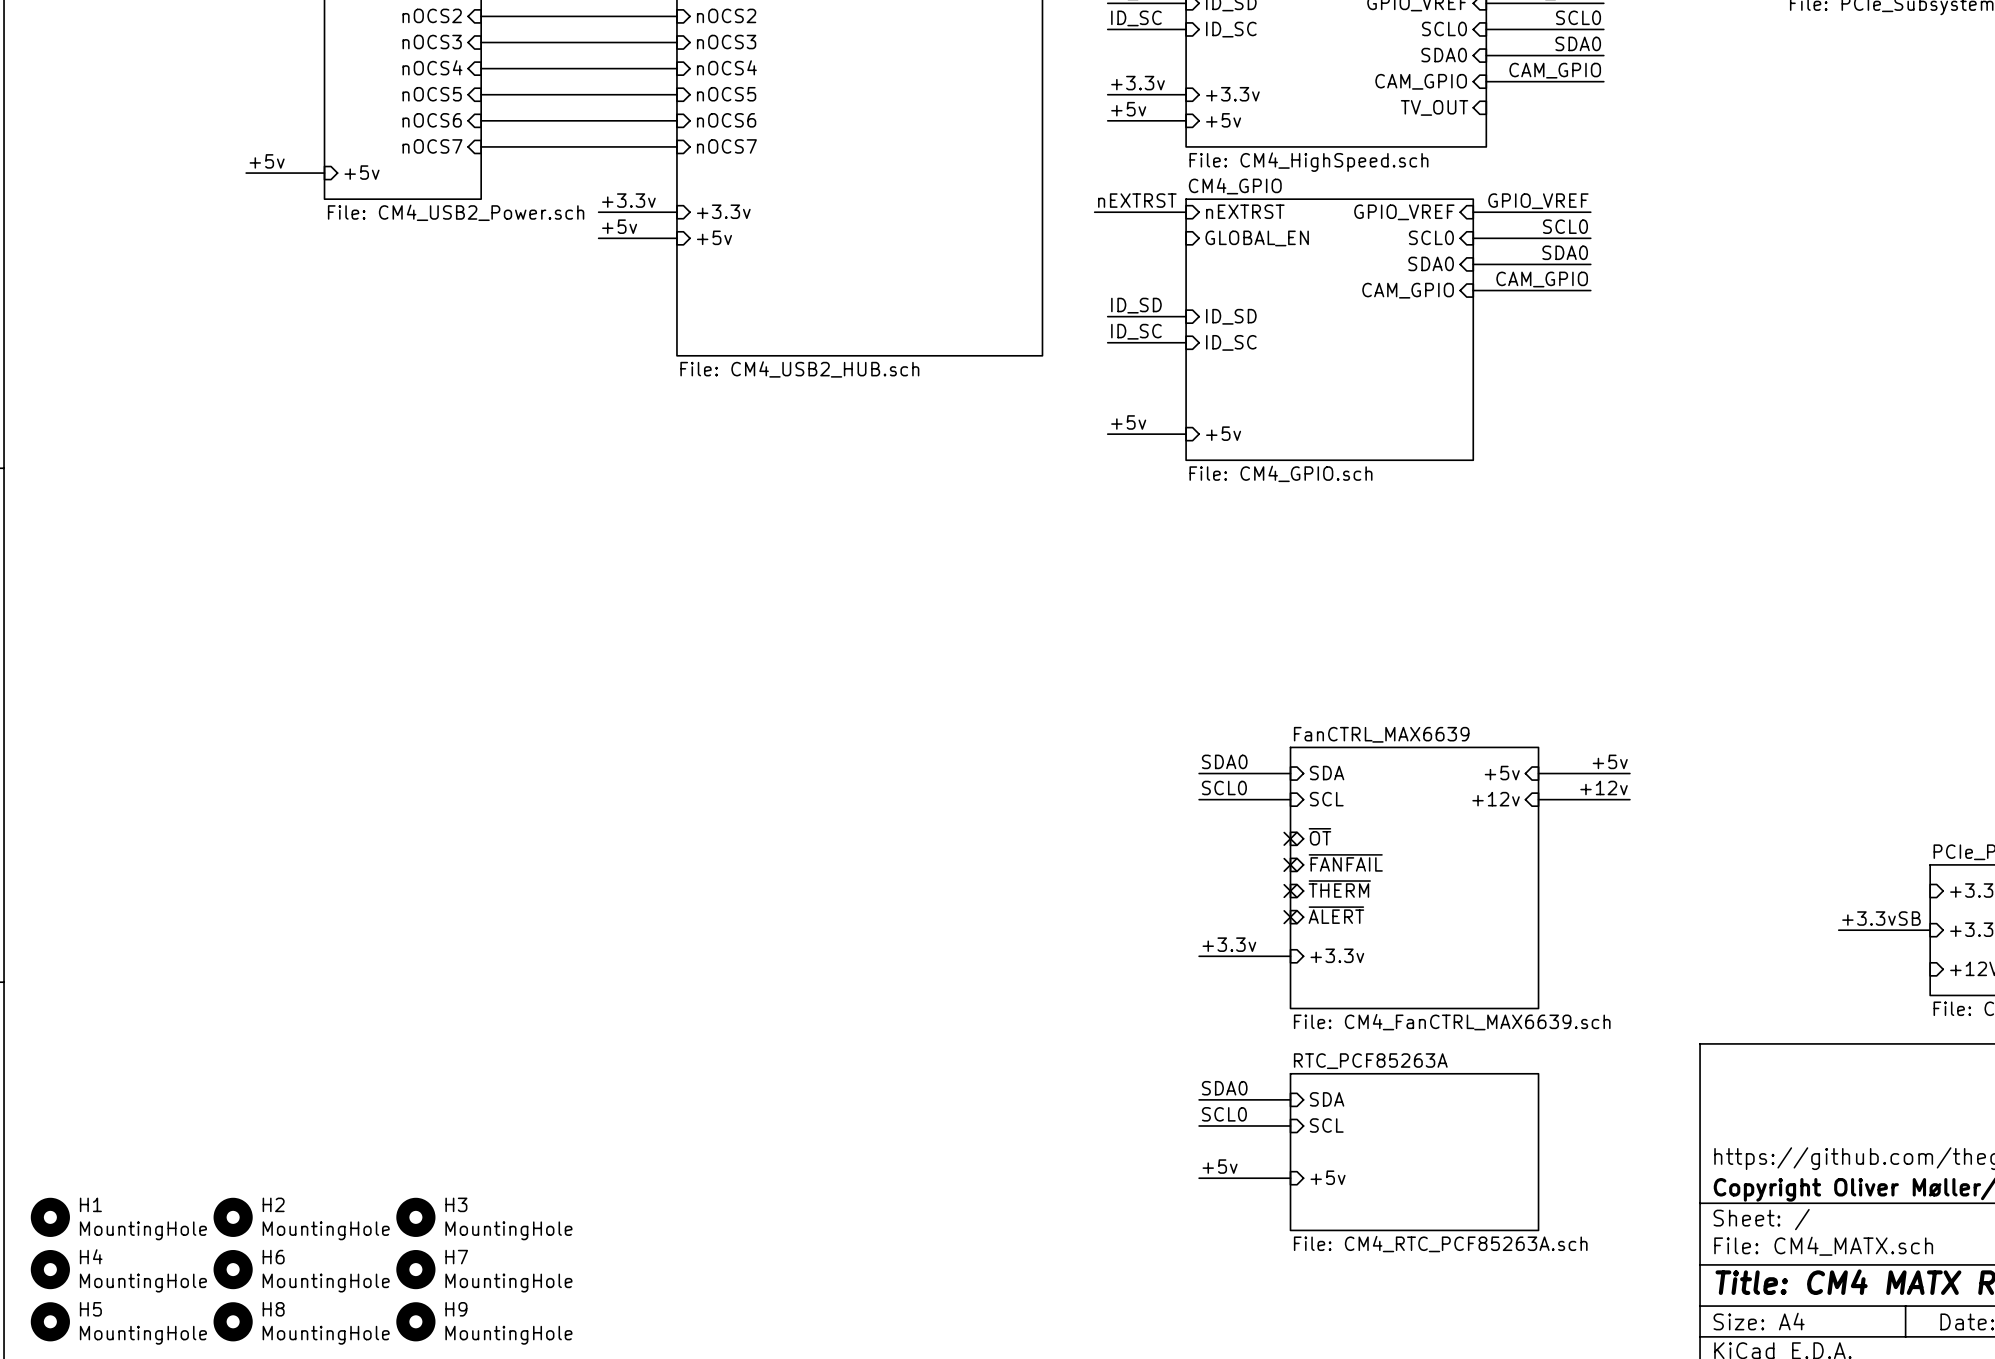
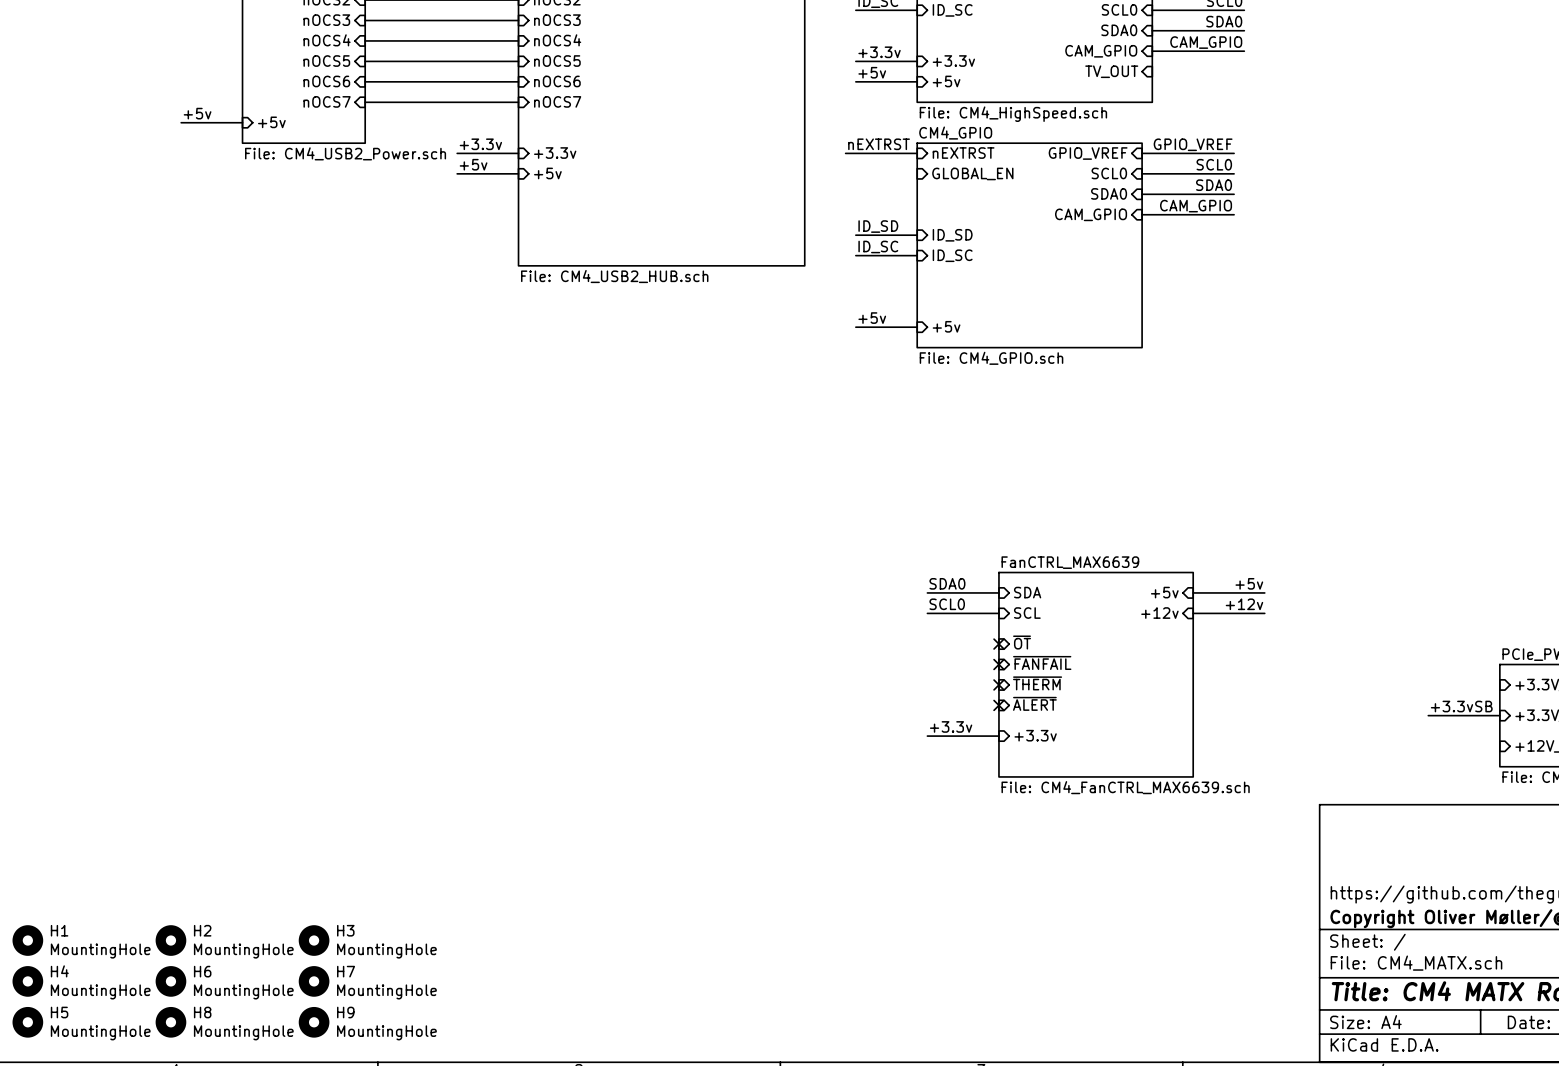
label: SDA0 (1224, 1088) -> none
wire: (1199, 1099) (1290, 1099) -> none
sheet pin: SDA (1327, 1099) -> none
label: SCL0 (1224, 1114) -> none
wire: (1199, 1125) (1290, 1125) -> none
sheet pin: SCL (1326, 1125) -> none
sheet RTC_PCF85263A: File: CM4_RTC_PCF85263A.sch (1414, 1152) -> none
label: +5v (1220, 1166) -> none
sheet pin: +5v (1328, 1177) -> none
wire: (1199, 1178) (1290, 1178) -> none

